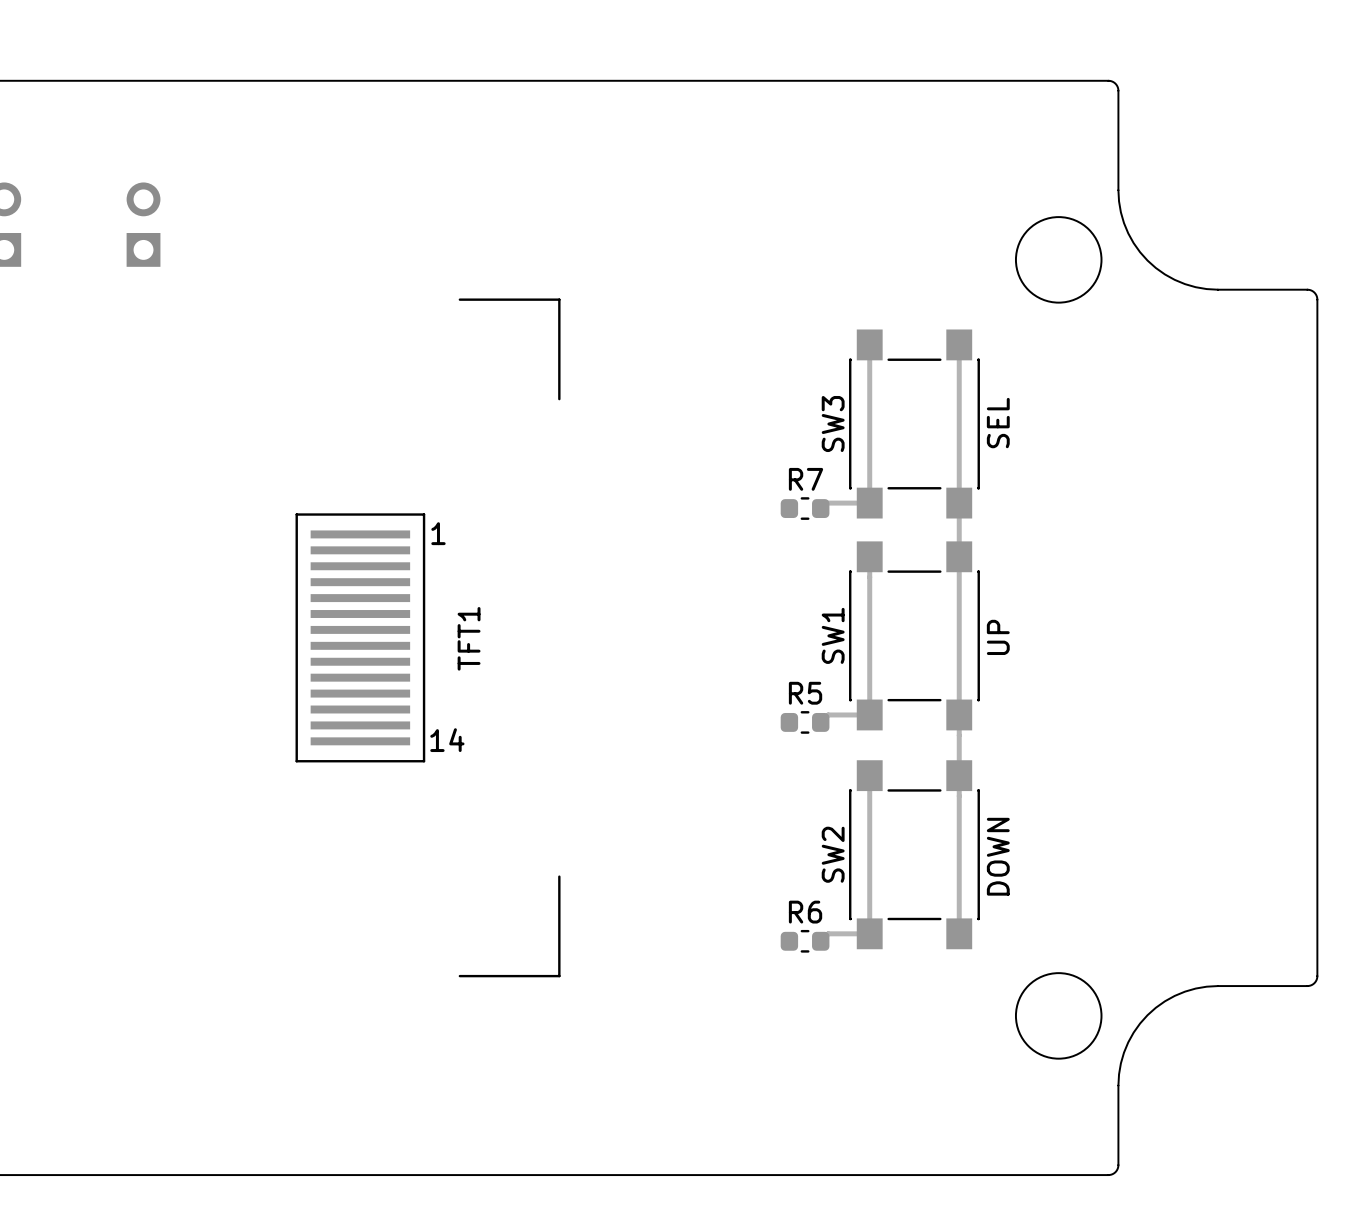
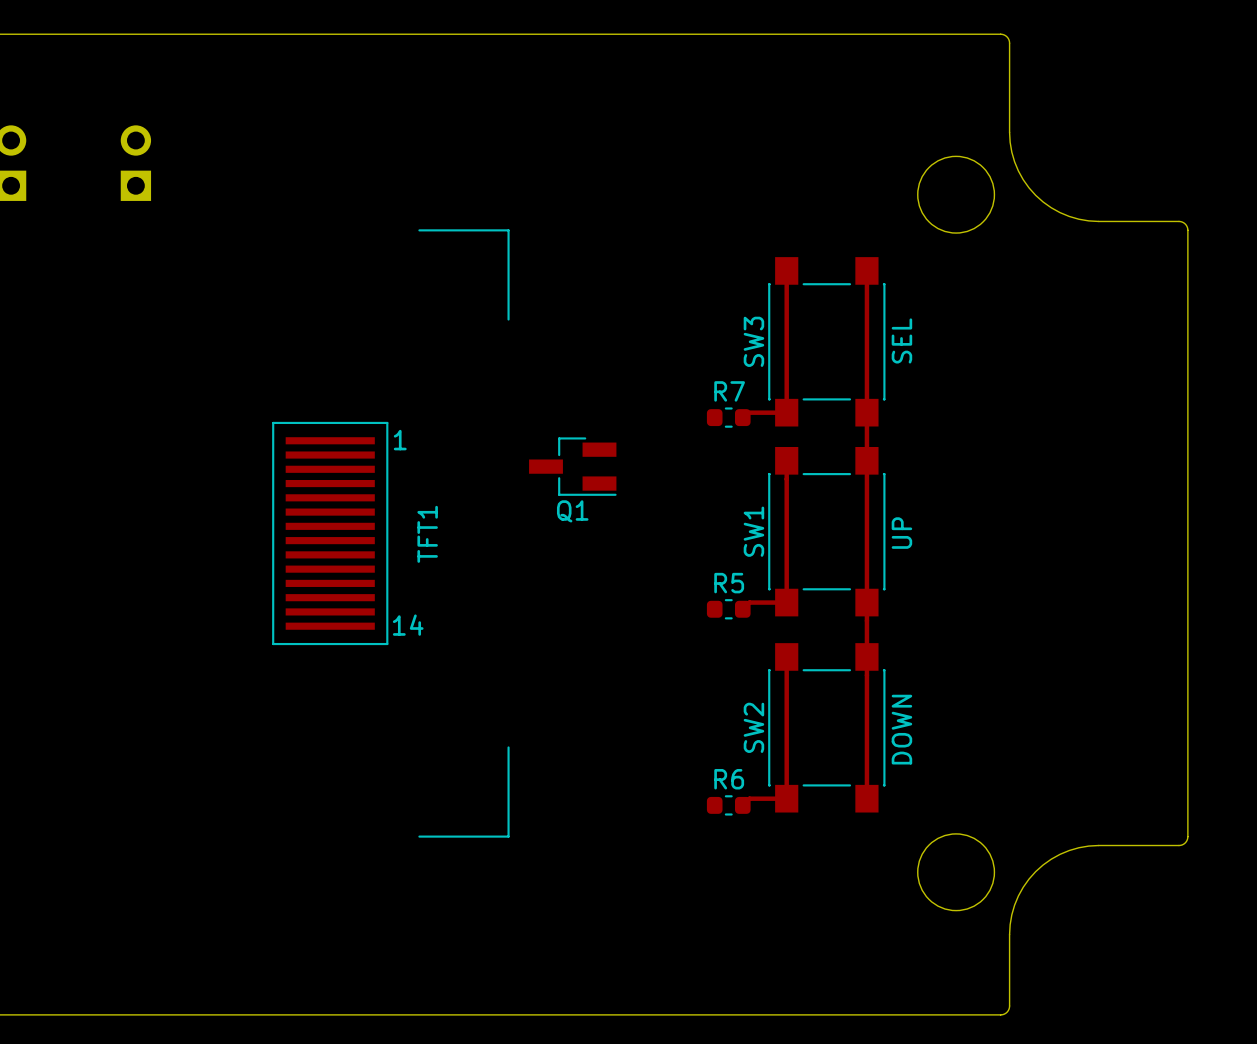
Q1: none -> (572, 466)

